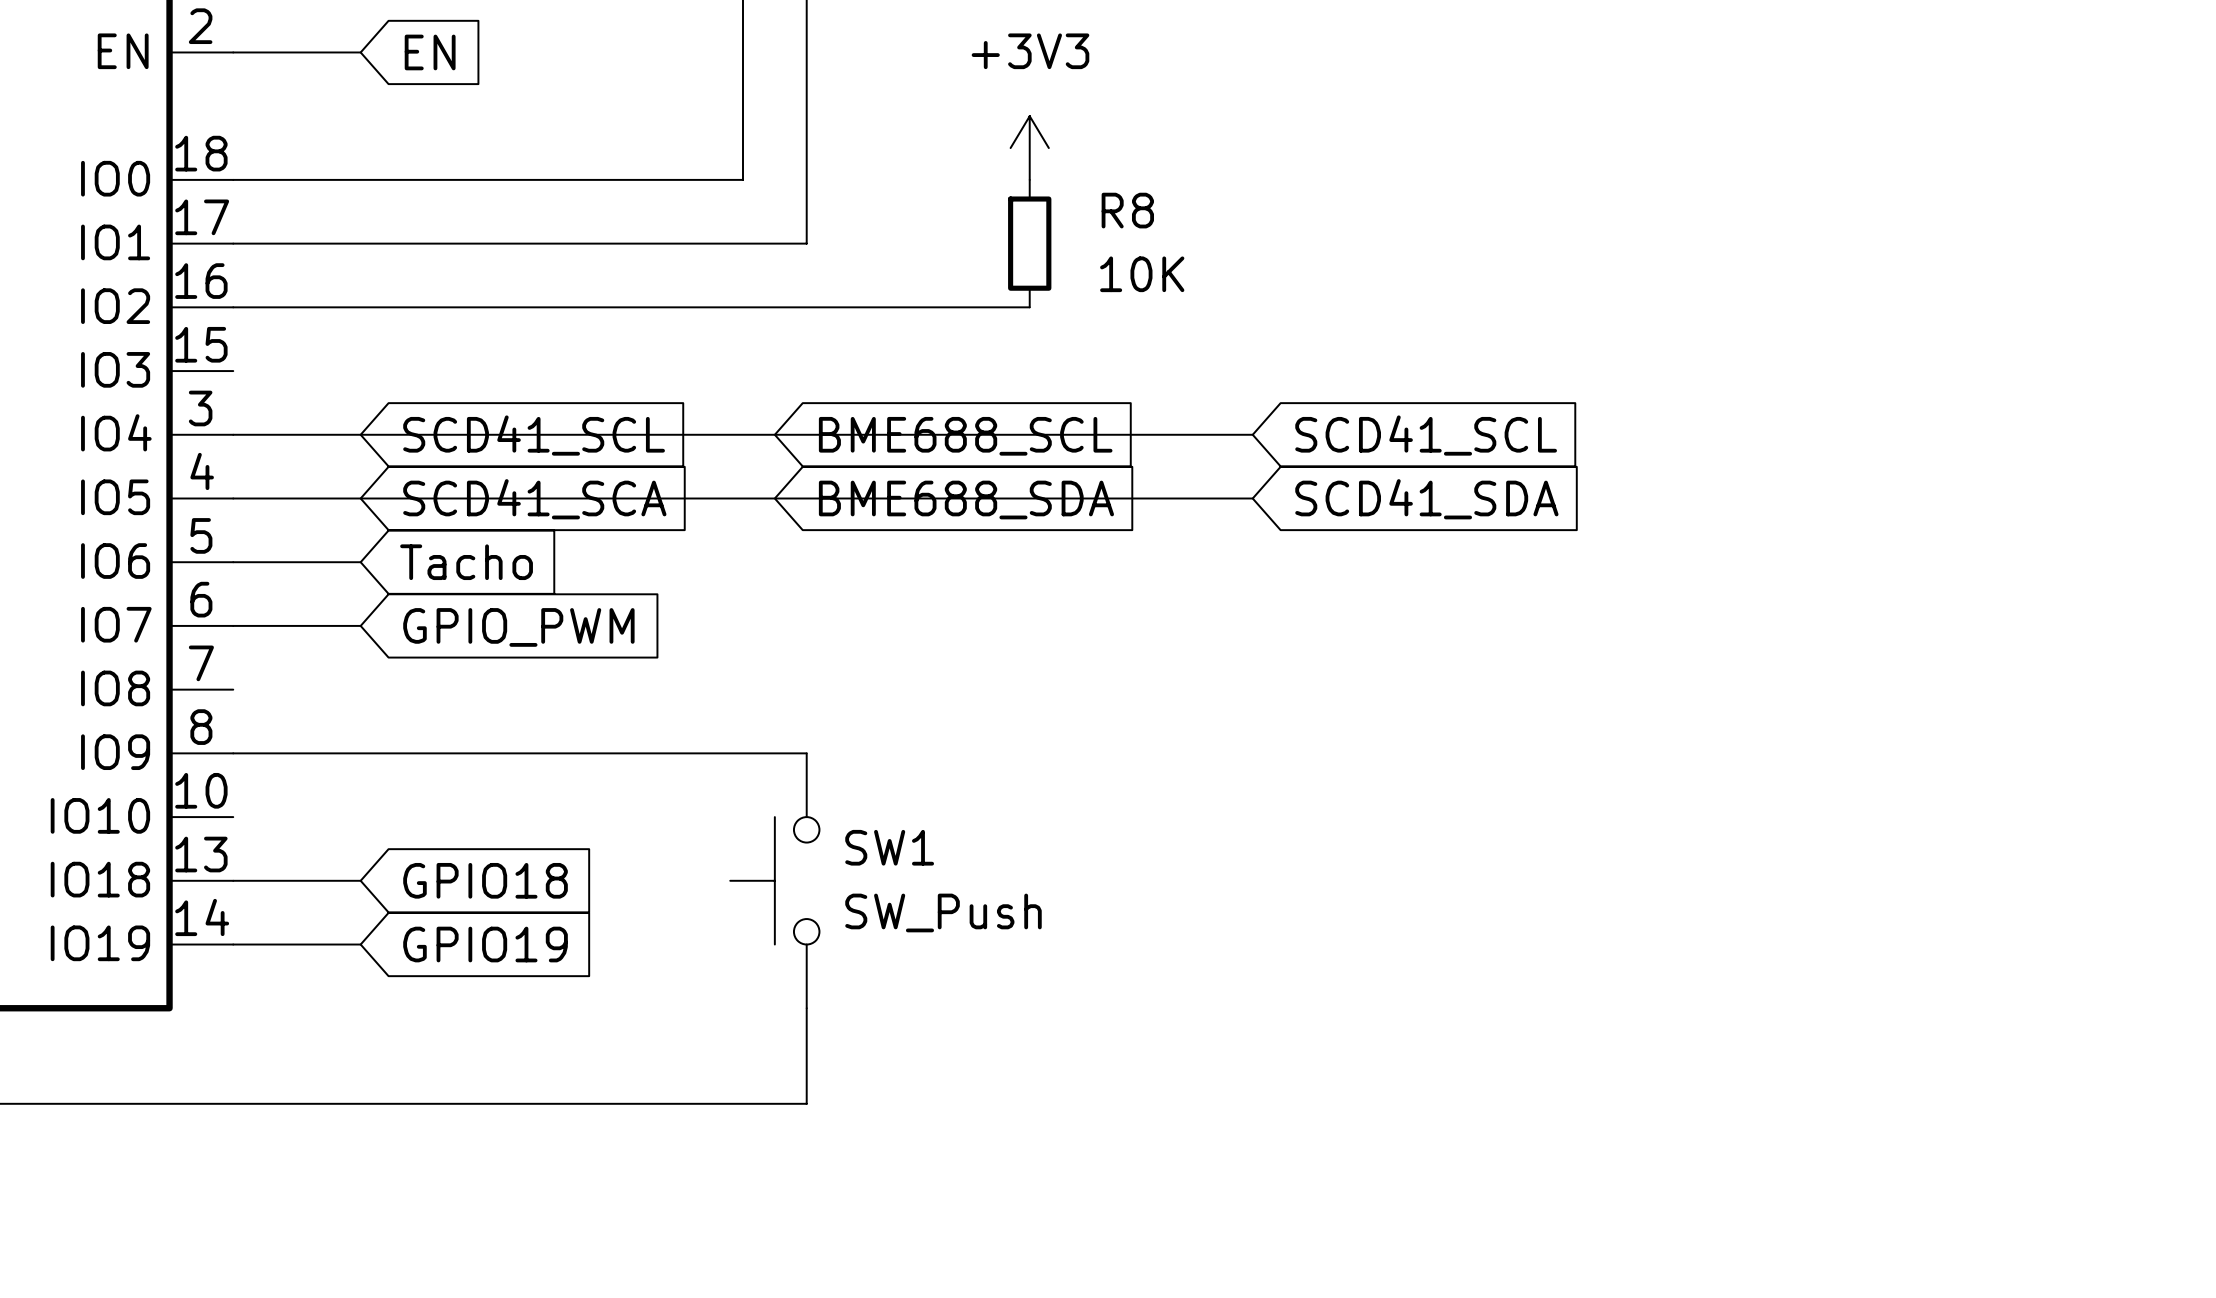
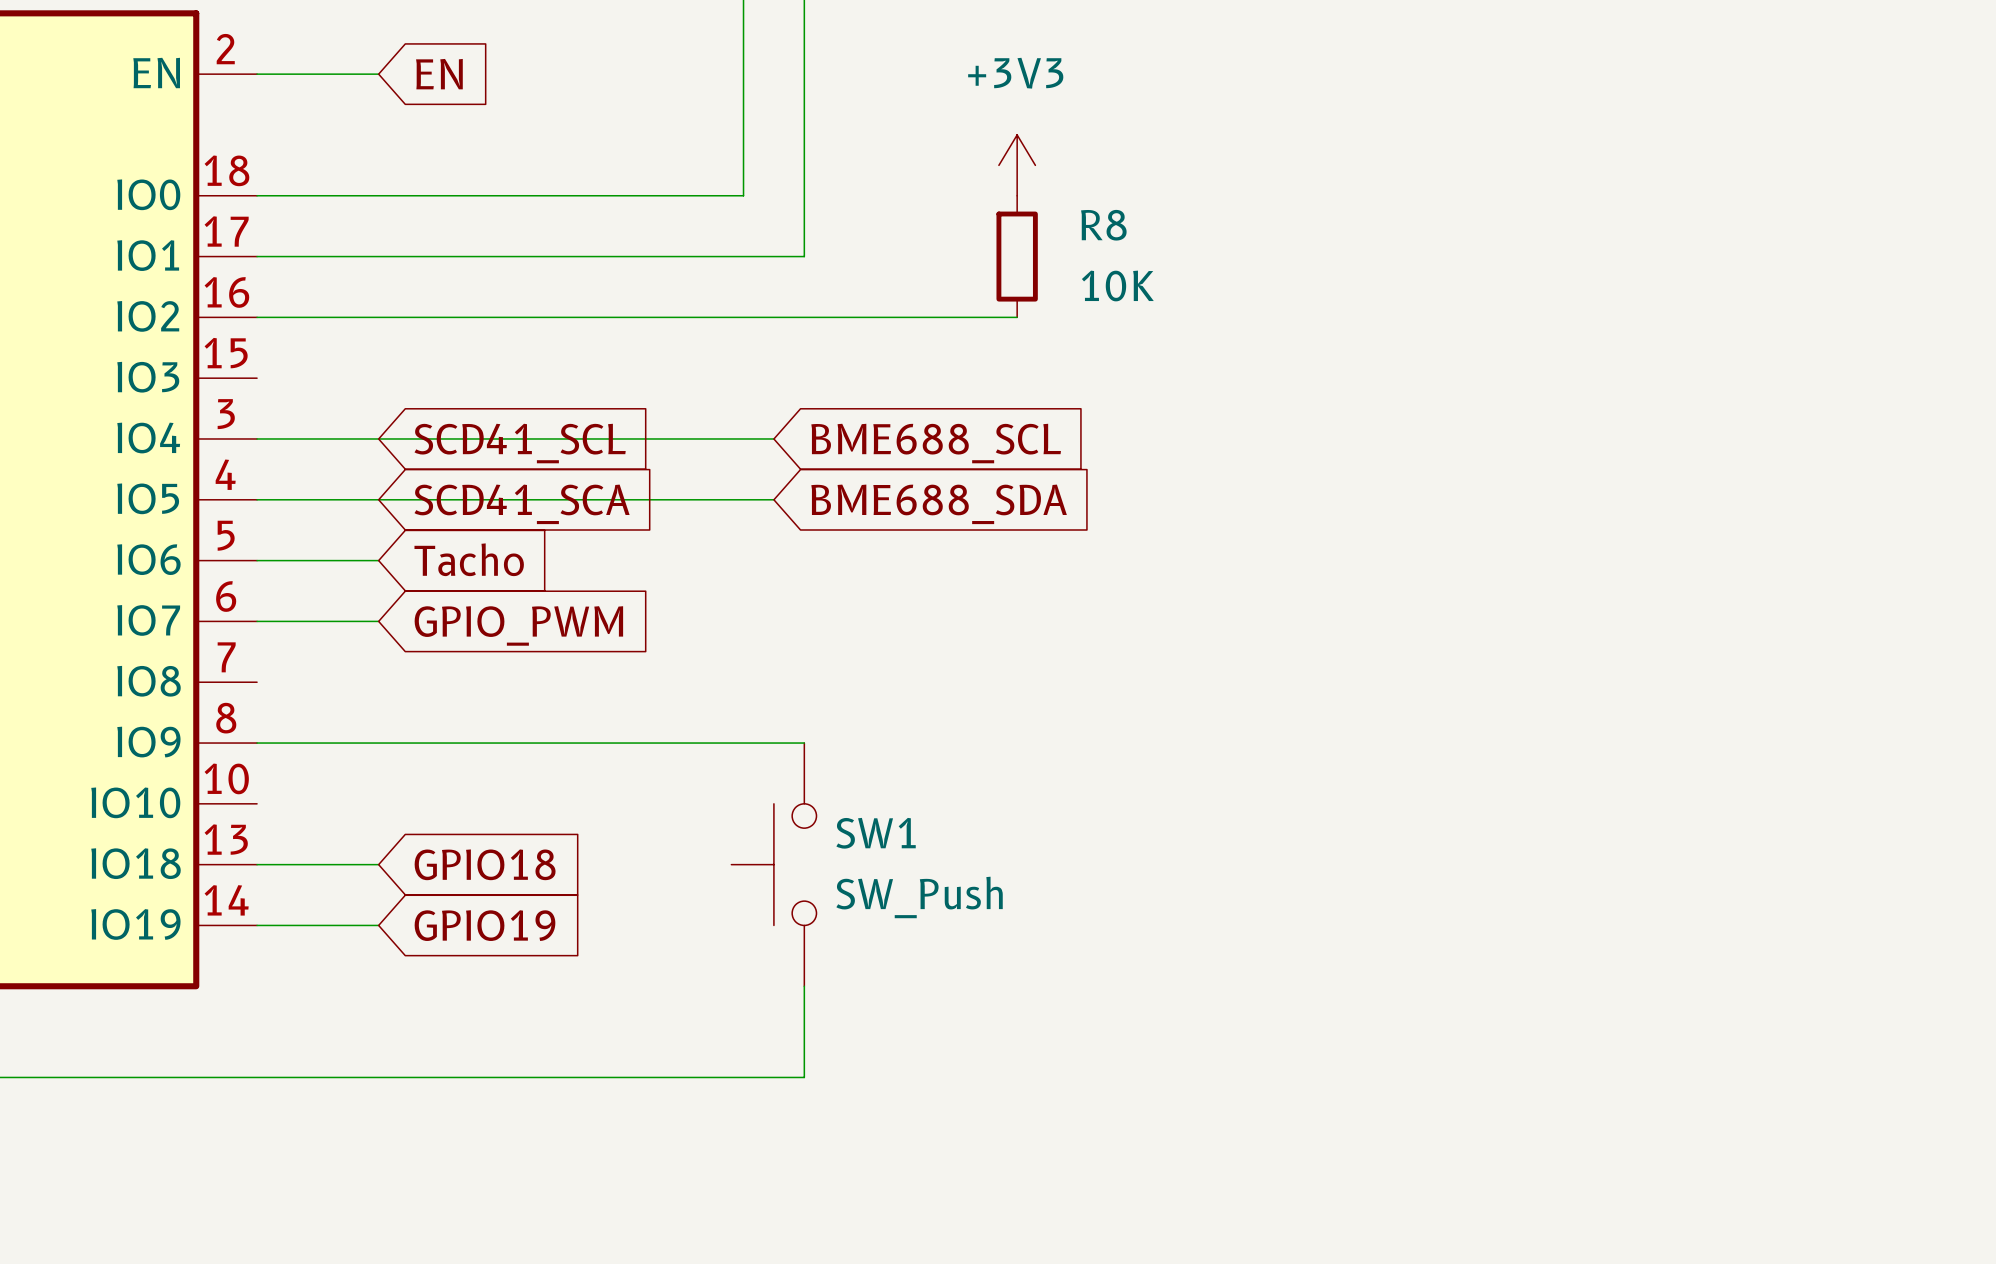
wire: (774, 434) (1252, 434) -> none
global label: SCD41_SCL (1426, 435) -> none
wire: (774, 498) (1252, 498) -> none
global label: SCD41_SDA (1426, 499) -> none

